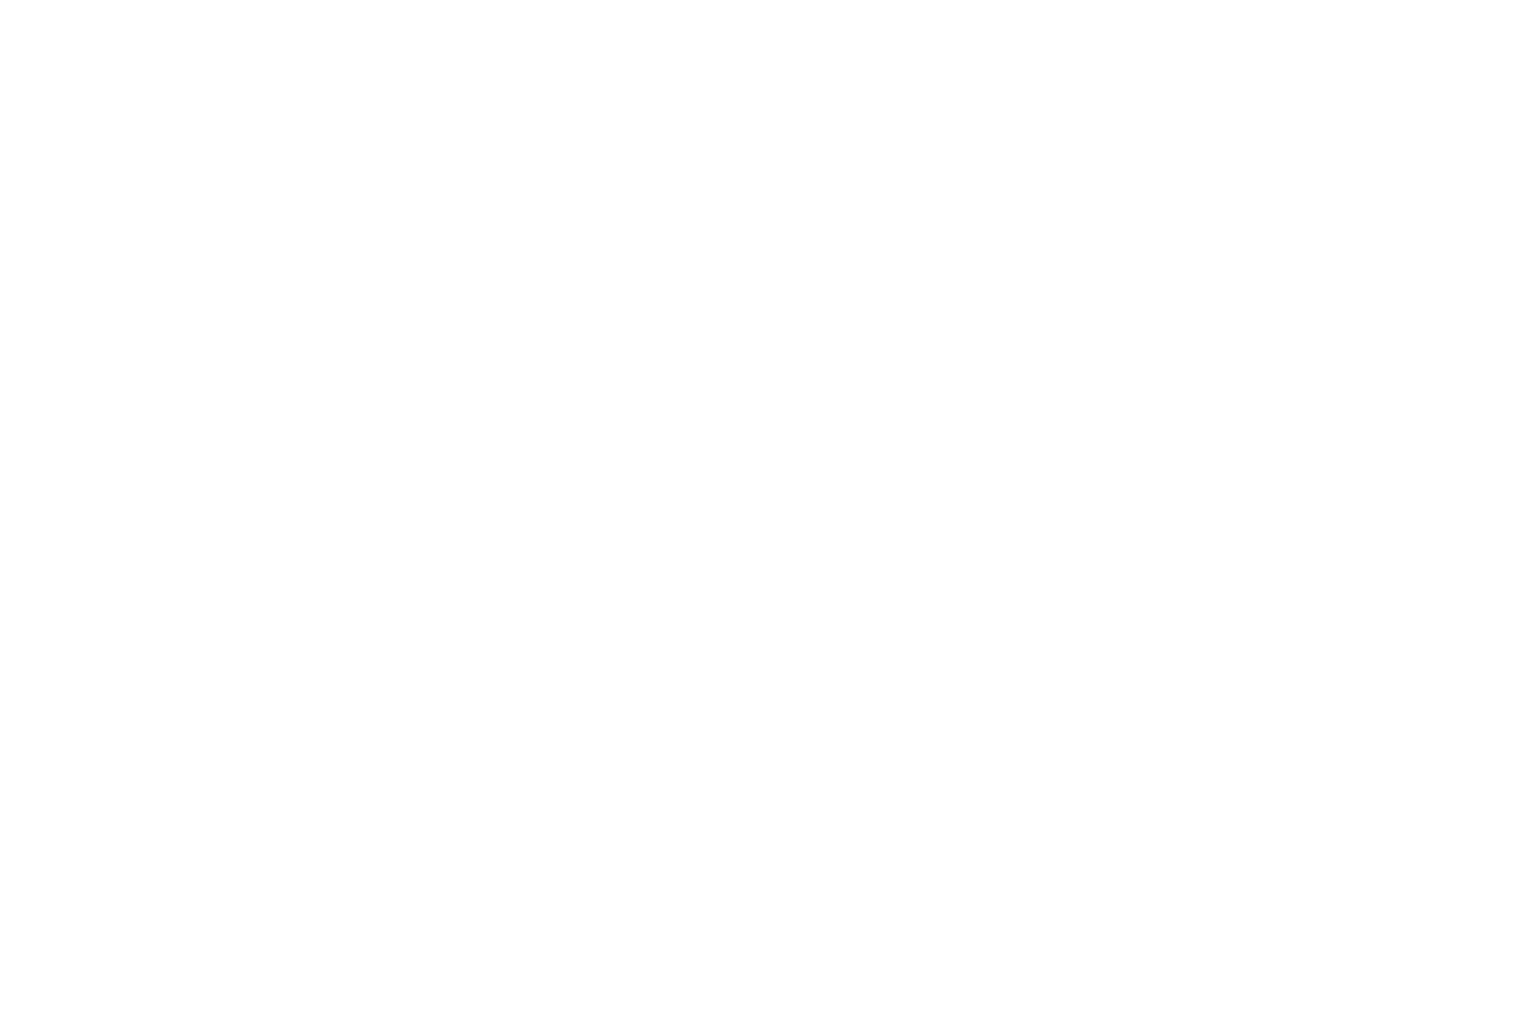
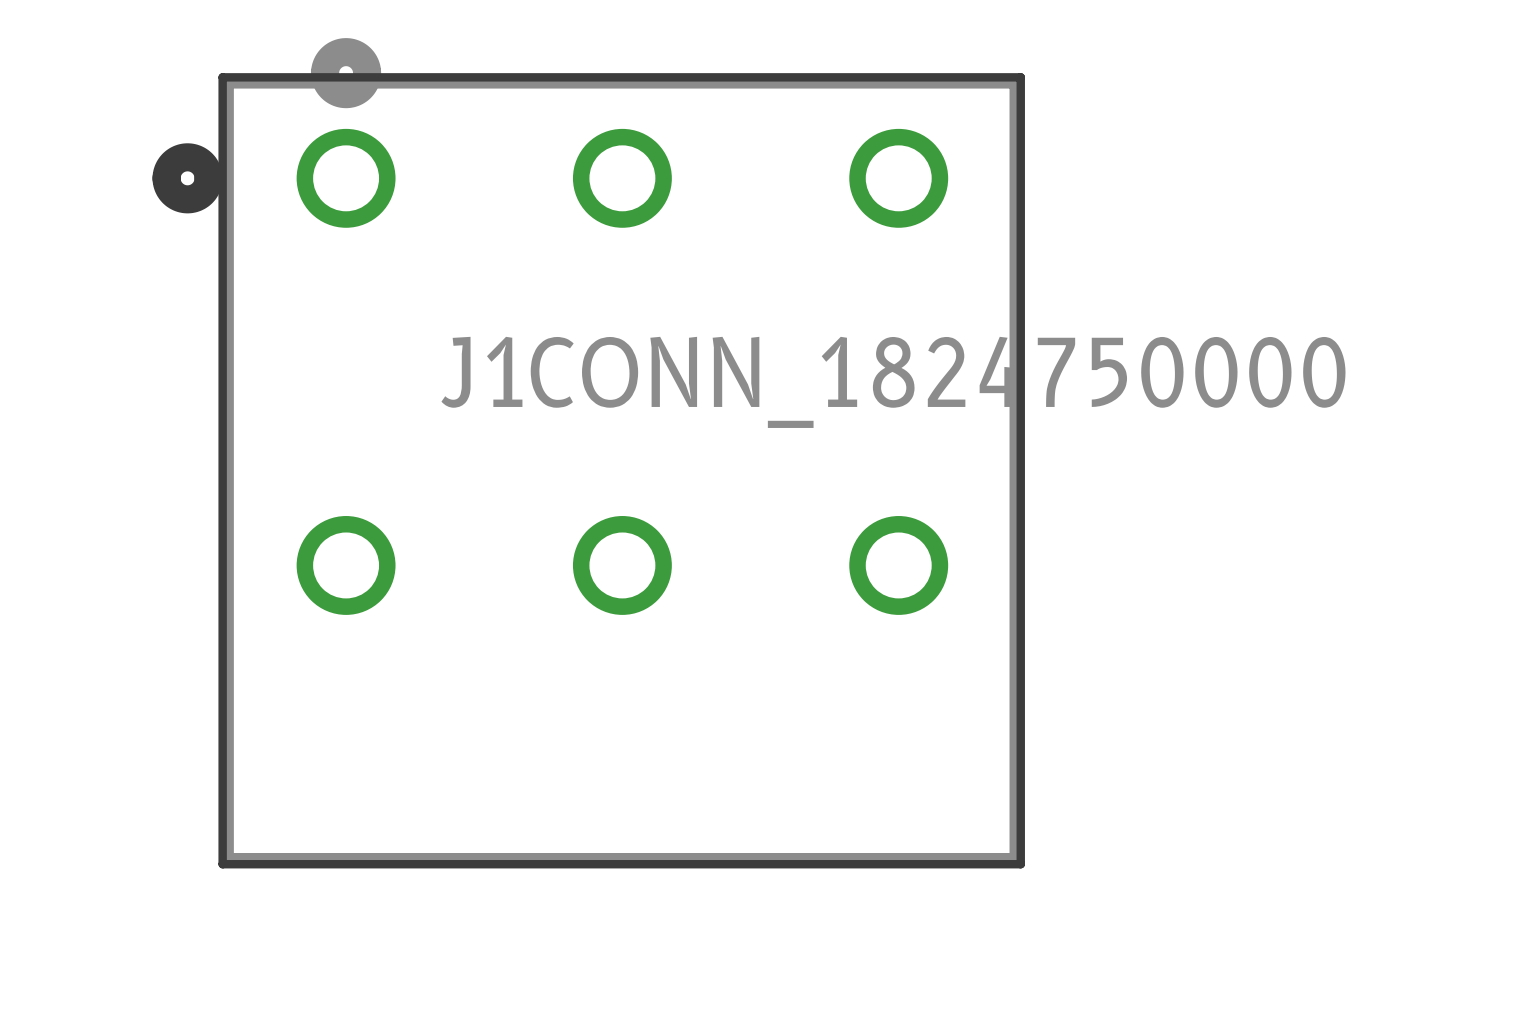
J1: none -> CONN_1824750000 (588, 453)

